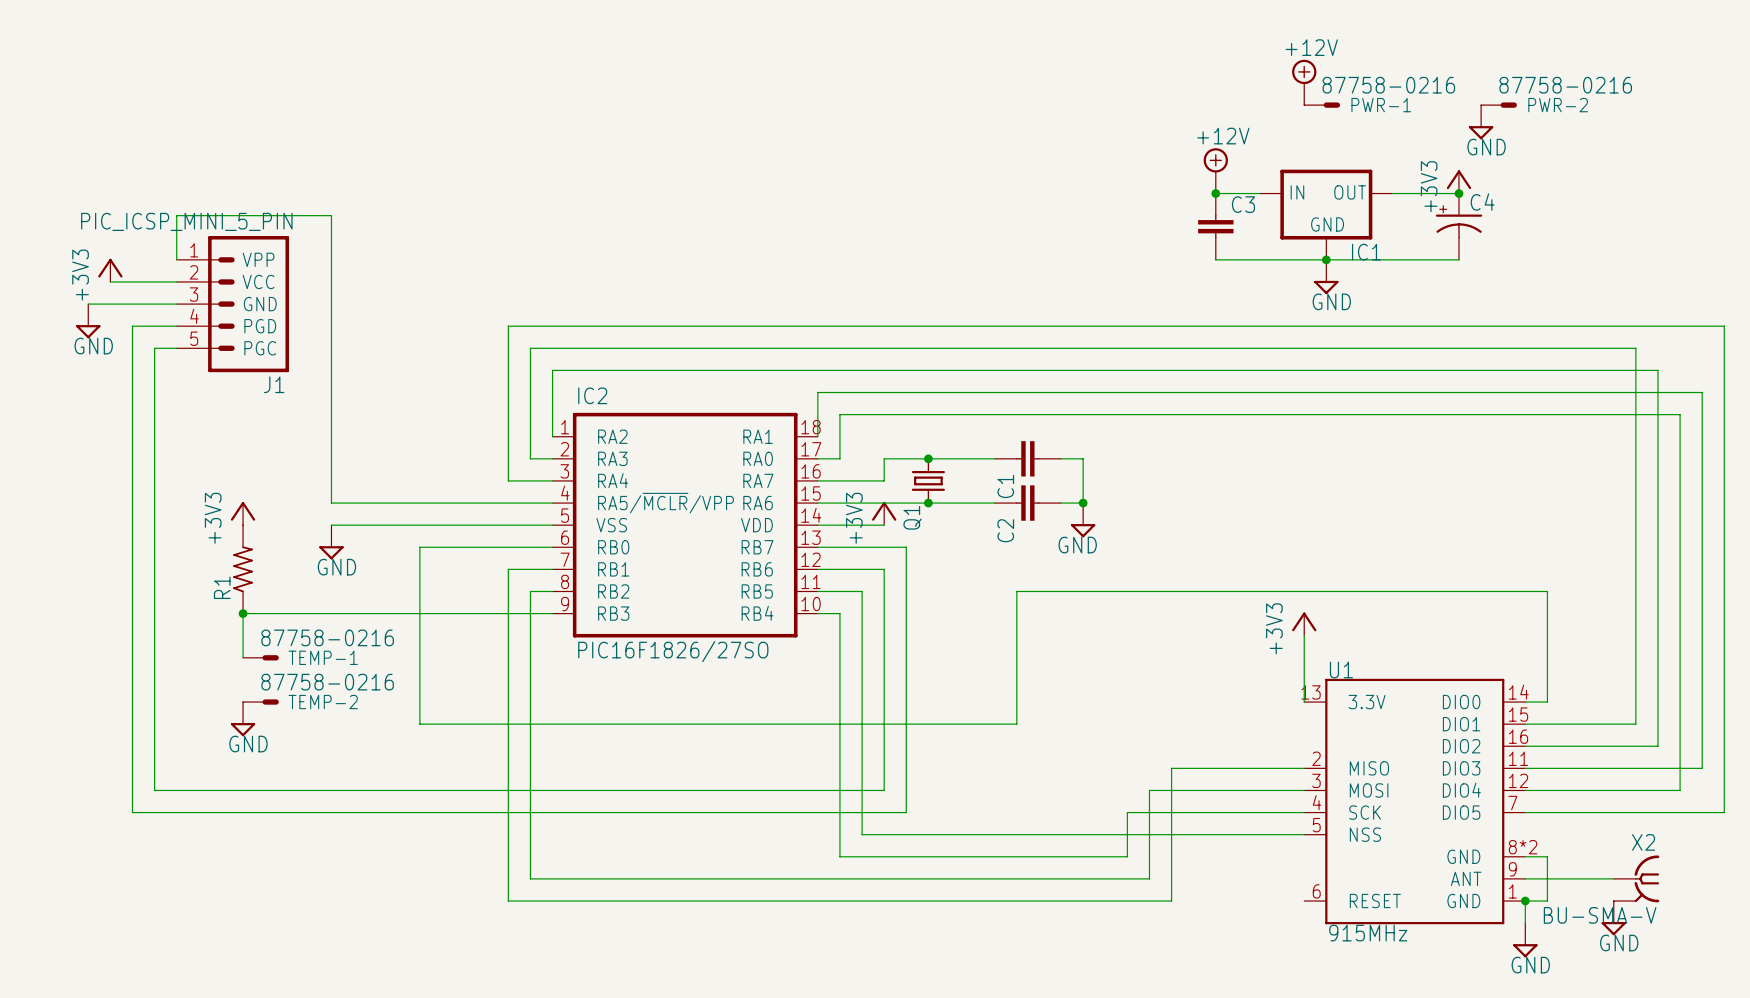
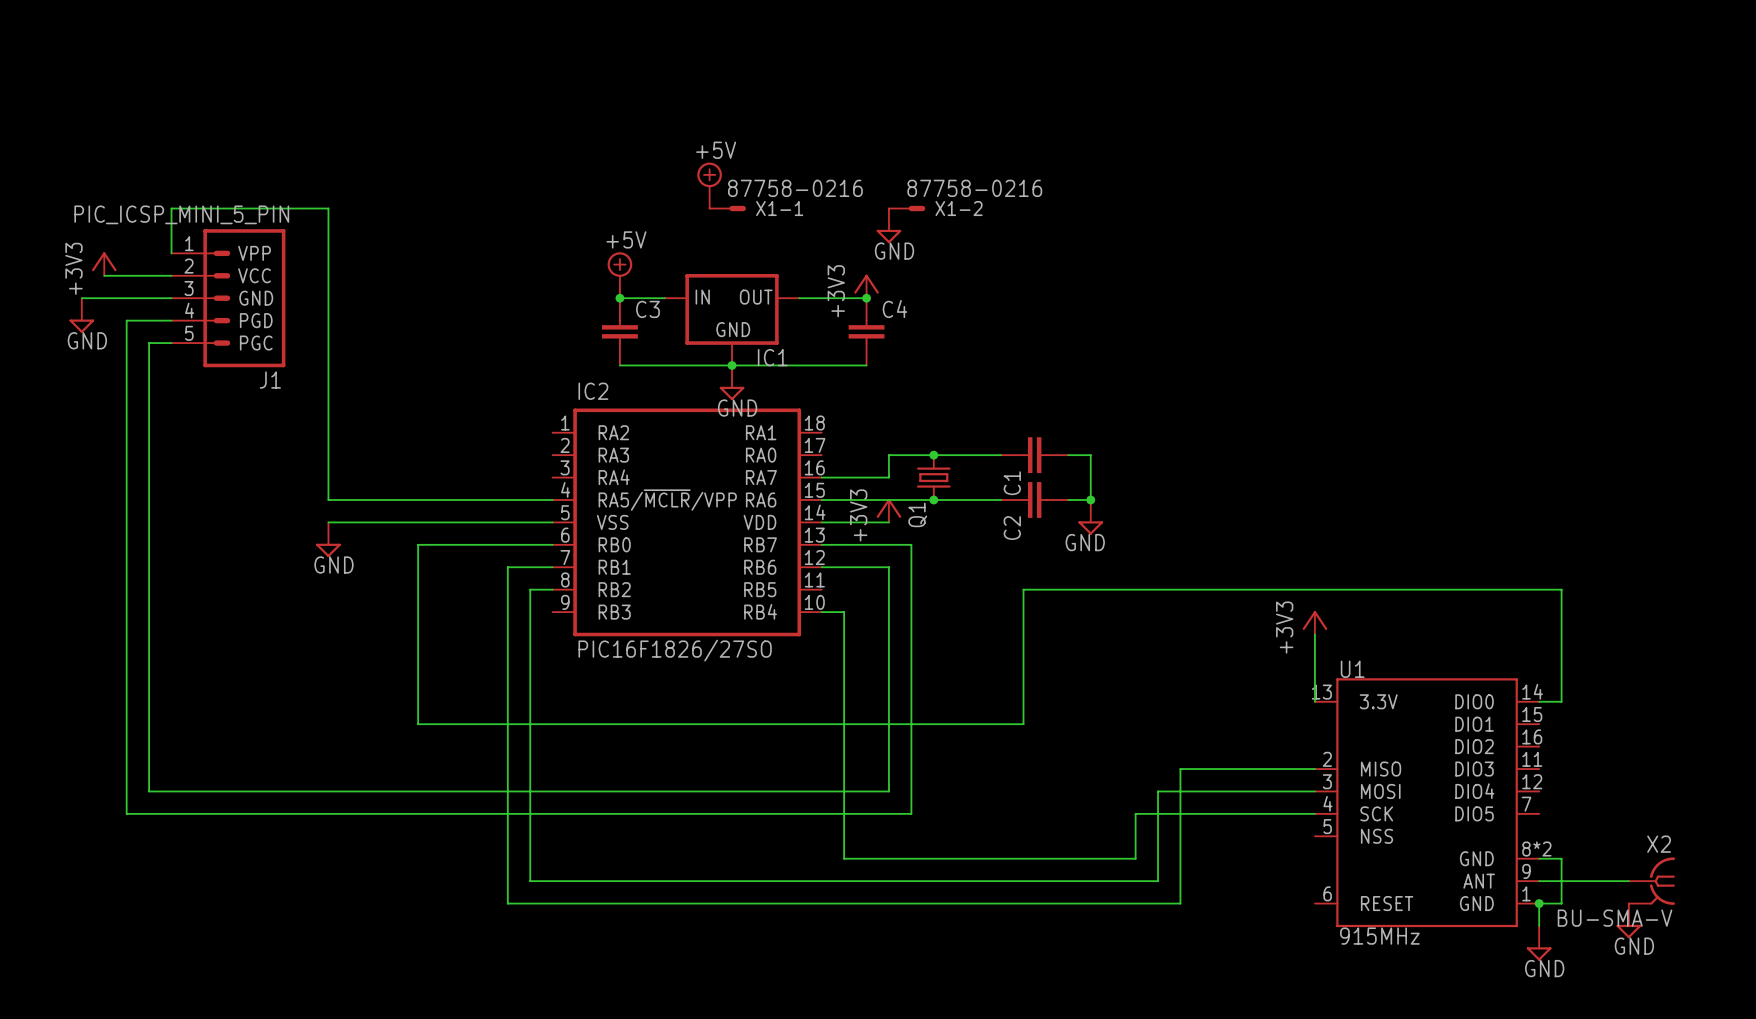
power symbol: +12V (1304, 82) -> none
PWR-1: 87758-0216 (1322, 105) -> none
PWR-2: 87758-0216 (1499, 105) -> none
power symbol: GND (1481, 122) -> none
power symbol: +12V (1215, 170) -> none
power symbol: +3V3 (1458, 181) -> none
power symbol: none -> +5V (709, 185)
wire: (1215, 193) (1260, 193) -> none
junction: (1215, 193) -> none
wire: (1392, 193) (1458, 193) -> none
C4 symbol: [1435, 193, 1483, 260] -> [848, 298, 885, 366]
junction: (1458, 193) -> none
IC1 position: (1326, 214) -> (732, 319)
X1-1: none -> 87758-0216 (727, 208)
X1-2: none -> 87758-0216 (907, 208)
C3 position: (1215, 226) -> (619, 331)
power symbol: none -> GND (888, 225)
wire: (1215, 259) (1458, 259) -> none
junction: (1326, 259) -> none
power symbol: GND (1326, 277) -> none
power symbol: none -> +5V (619, 275)
power symbol: none -> +3V3 (866, 286)
wire: none -> (619, 298) (664, 298)
junction: none -> (619, 298)
wire: none -> (799, 298) (866, 298)
junction: none -> (866, 298)
wire: (618, 370) (552, 370) (552, 436) -> none
junction: none -> (732, 365)
wire: (862, 370) (1657, 370) (1657, 746) (1525, 746) -> none
power symbol: none -> GND (732, 382)
wire: (817, 436) (817, 392) (1702, 392) (1702, 768) (1525, 768) -> none
wire: (552, 458) (530, 458) (530, 348) (1635, 348) (1635, 724) (1525, 724) -> none
wire: (817, 458) (839, 458) (839, 414) (1680, 414) (1680, 790) (1525, 790) -> none
wire: (552, 480) (508, 480) (508, 326) (1724, 326) (1724, 812) (1525, 812) -> none
power symbol: +3V3 (243, 513) -> none
R1: (243, 569) -> none
wire: (817, 591) (862, 591) (862, 834) (1304, 834) -> none
junction: (243, 613) -> none
wire: (552, 613) (243, 613) (243, 657) -> none
TEMP-1: 87758-0216 (260, 657) -> none
TEMP-2: 87758-0216 (260, 702) -> none
power symbol: GND (243, 719) -> none

